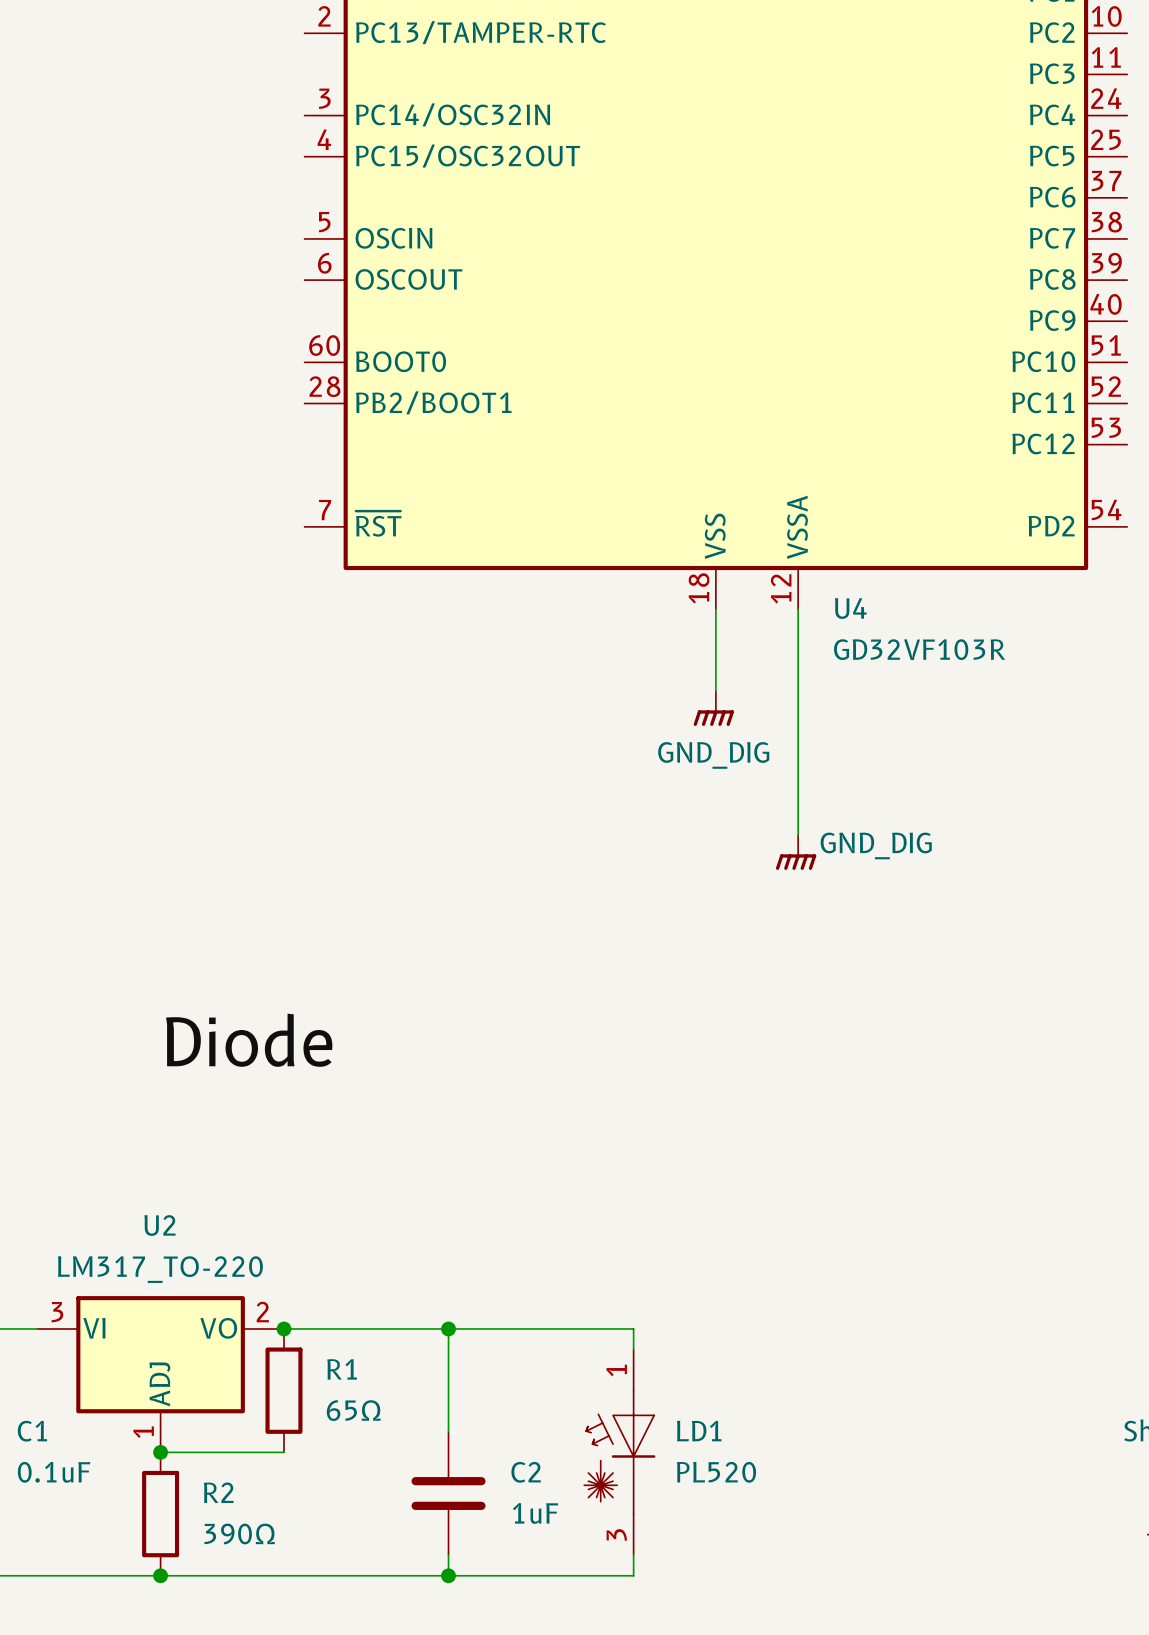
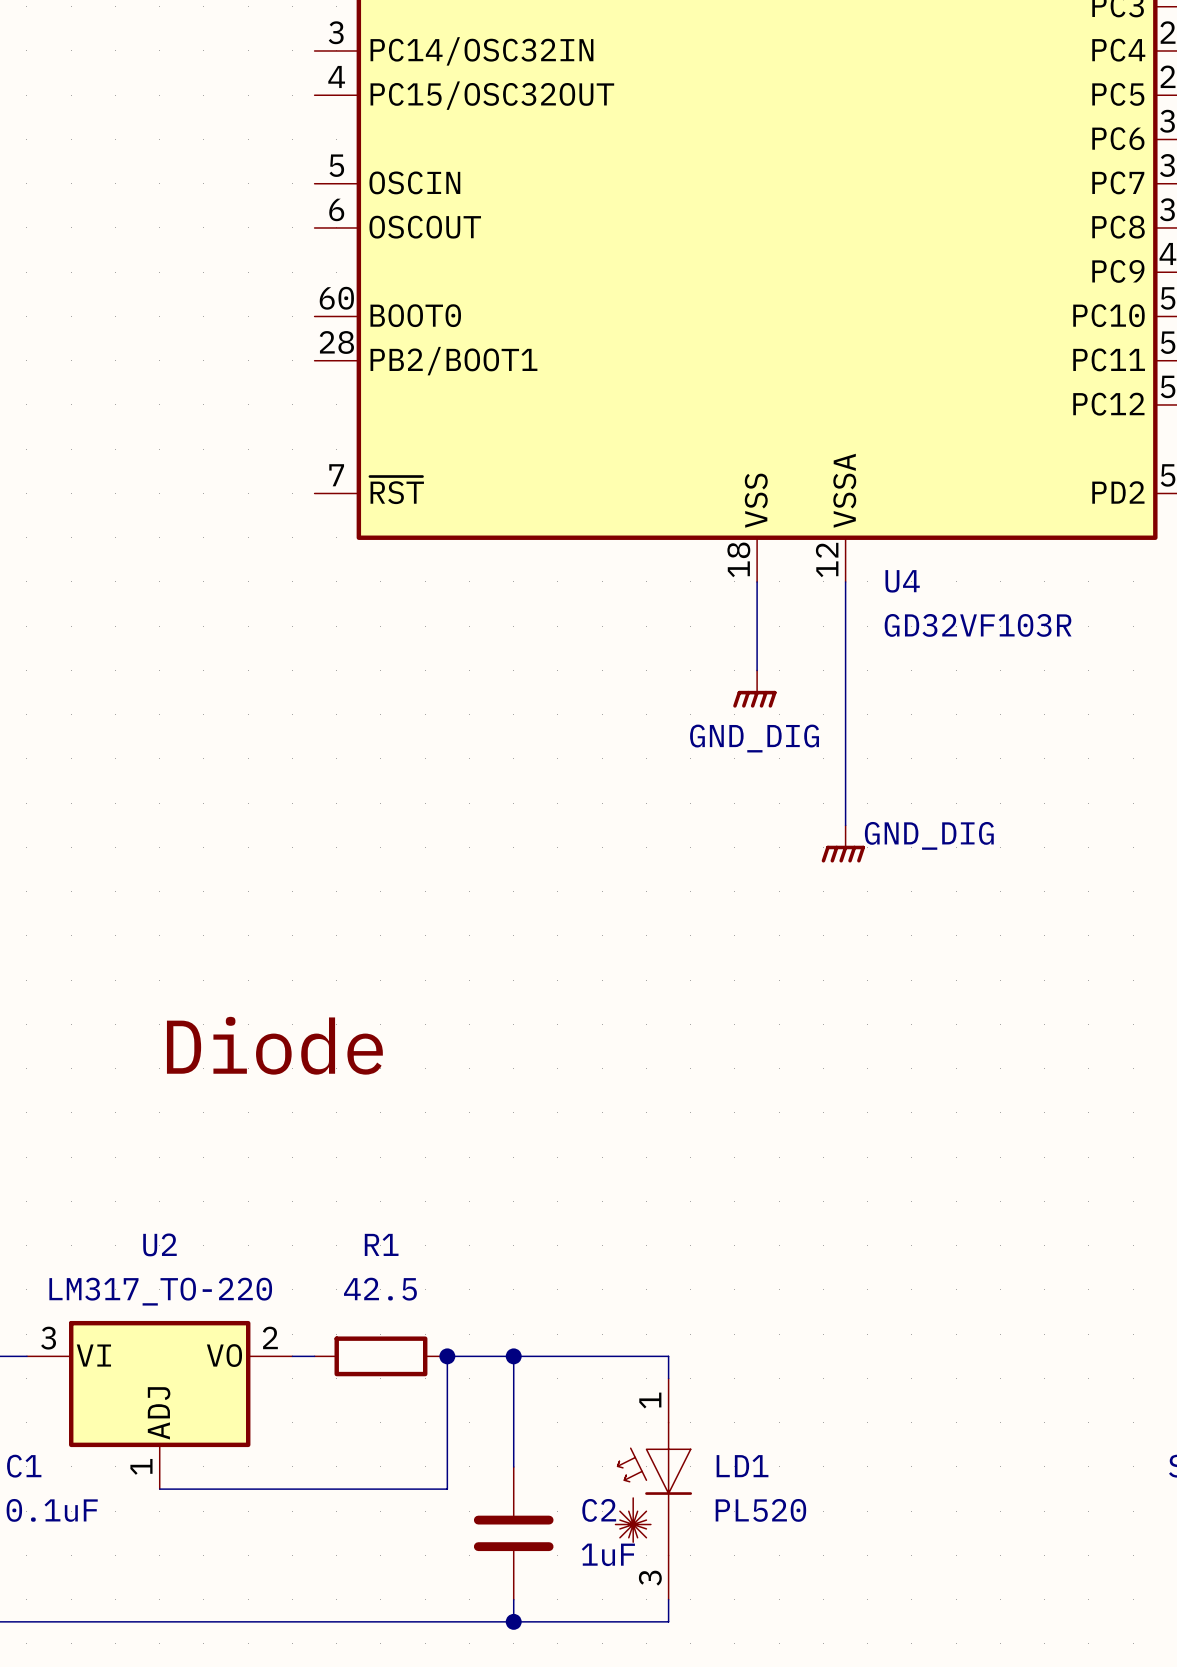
junction: (283, 1328) -> none
wire: (304, 1328) (427, 1328) -> (292, 1489) (447, 1489) (447, 1356)
junction: none -> (447, 1356)
wire: (448, 1328) (448, 1431) -> (513, 1356) (513, 1466)
junction: (448, 1328) -> none
junction: none -> (513, 1356)
R1 name position: R1 (342, 1369) -> R1 (381, 1244)
R1 rotation: 0° (283, 1390) -> 90° clockwise (380, 1356)
R1 position: (283, 1390) -> (380, 1356)
R1 value: 65Ω (353, 1410) -> 42.5 (380, 1289)
junction: (160, 1452) -> none
C2 position: (448, 1493) -> (513, 1533)
R2: 390Ω (160, 1514) -> none
wire: (448, 1555) (448, 1575) -> (513, 1599) (513, 1621)
junction: (160, 1575) -> none
junction position: (448, 1575) -> (513, 1621)

